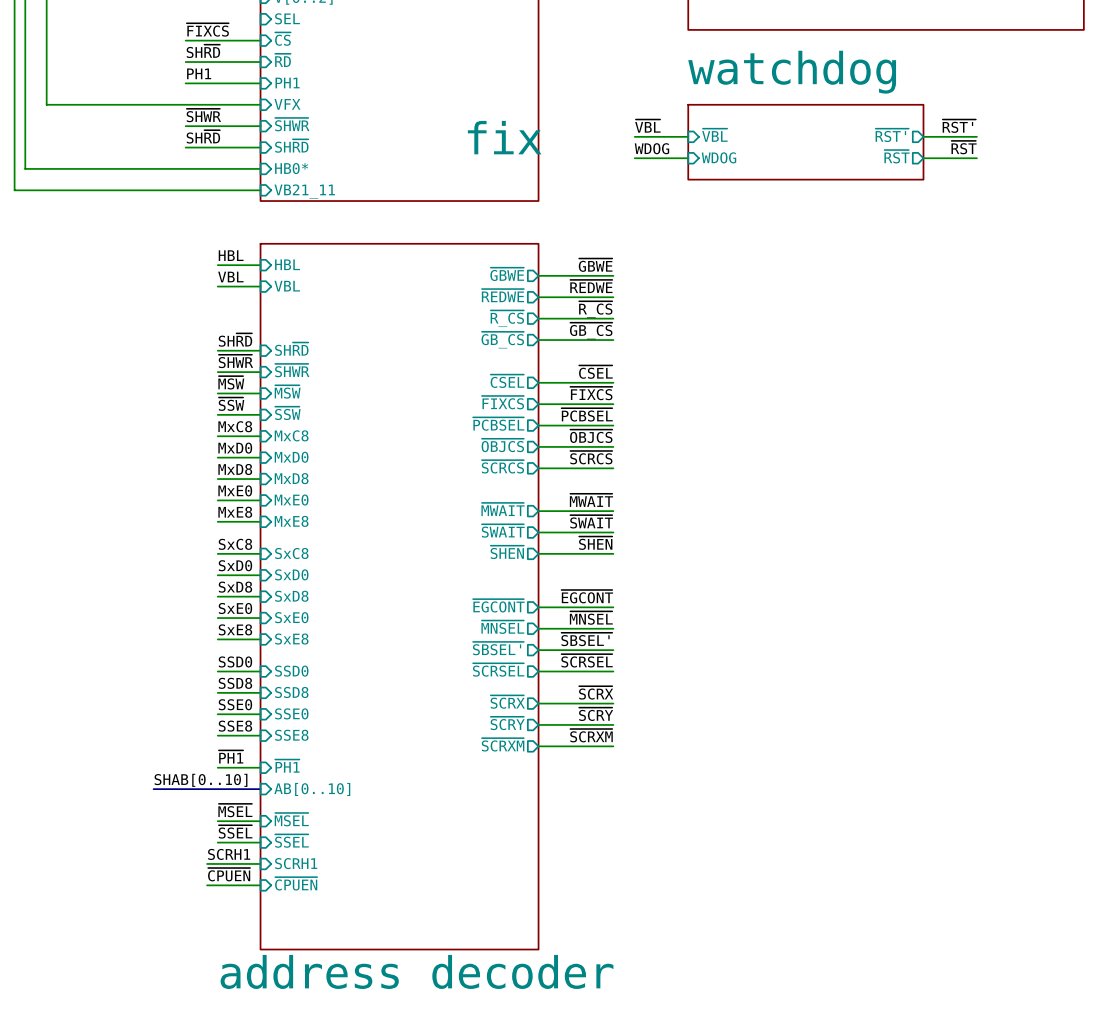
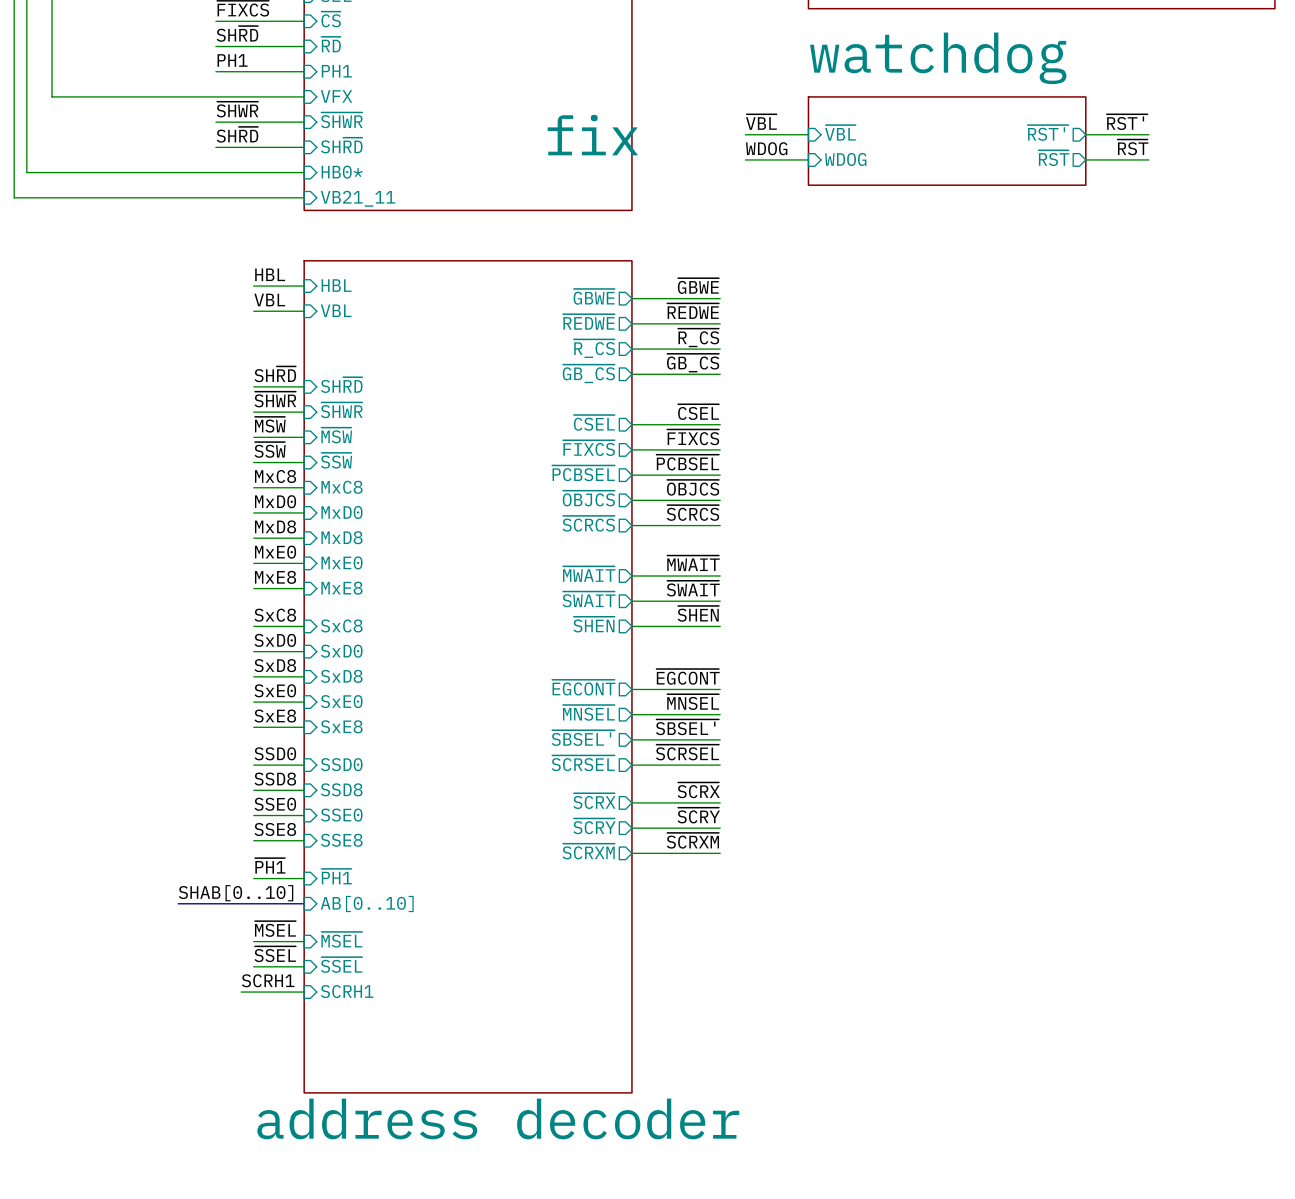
label: ~{CPUEN} (229, 874) -> none
sheet pin: ~{CPUEN} (296, 883) -> none
wire: (207, 885) (260, 885) -> none

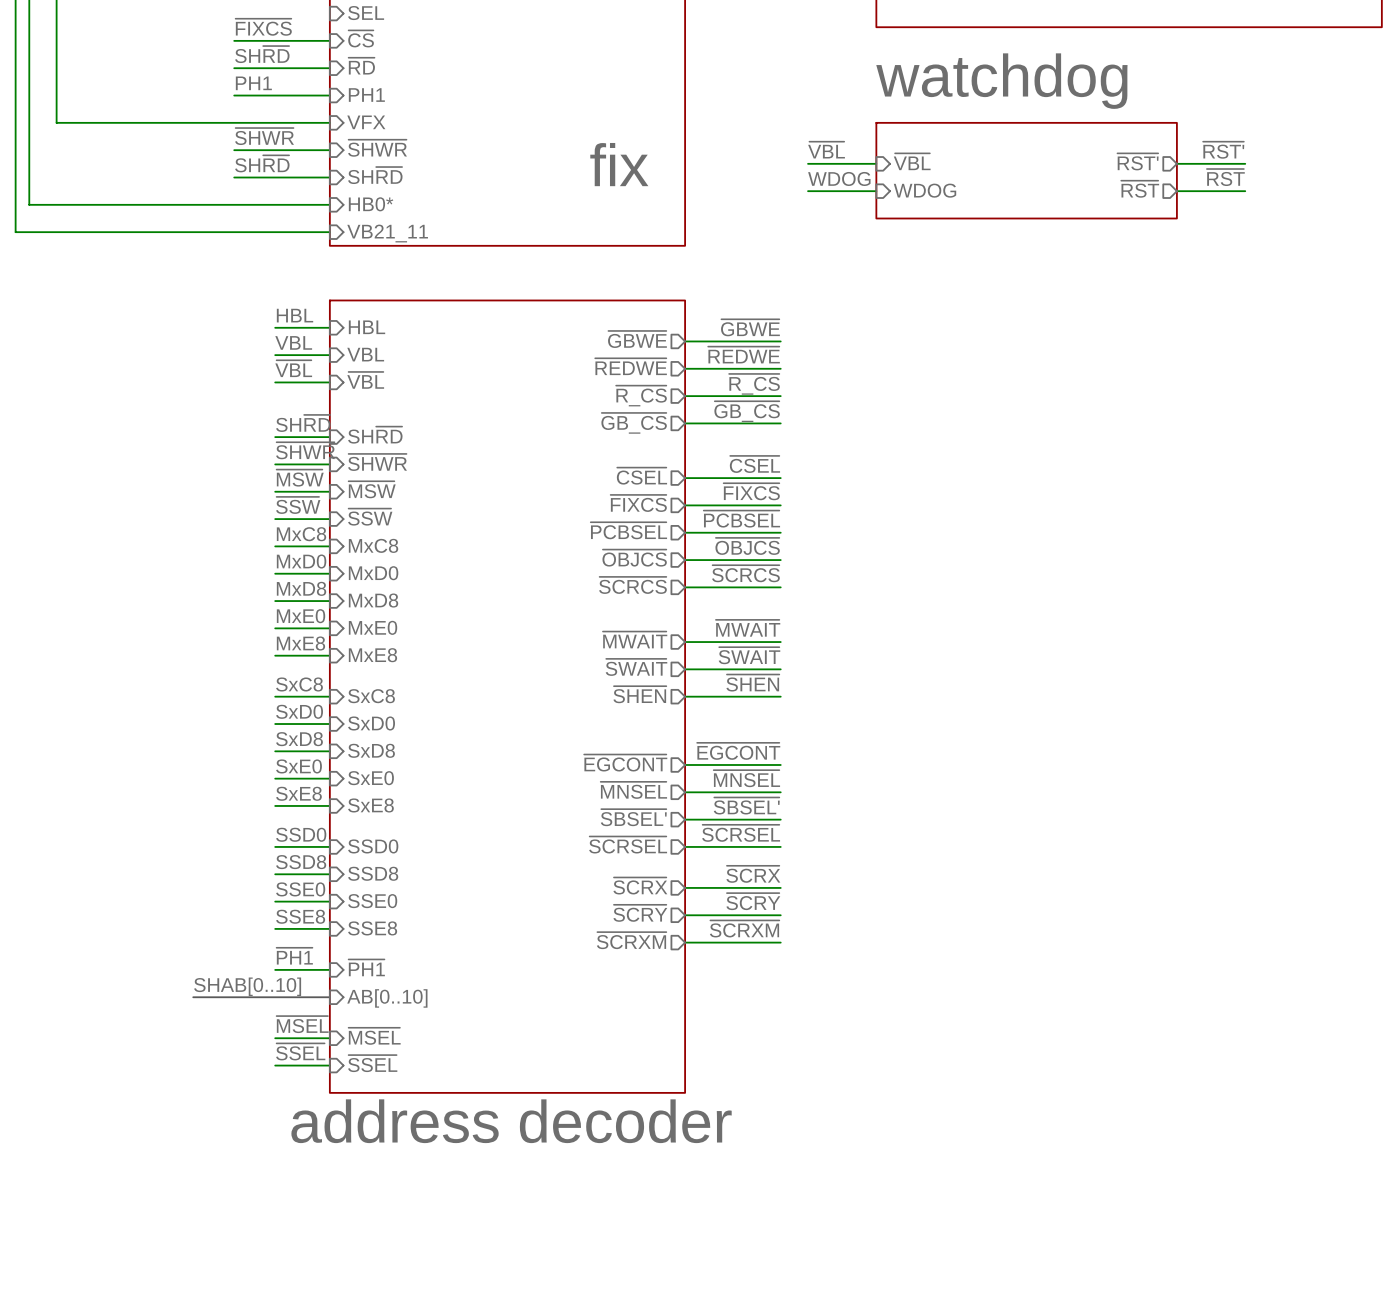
label: none -> ~{VBL} (293, 368)
sheet pin: none -> ~{VBL} (365, 380)
wire: none -> (275, 382) (329, 382)
sheet address decoder: none -> (507, 696)
sheet address decoder: (468, 676) -> none
label: SCRH1 (268, 980) -> none
sheet pin: SCRH1 (347, 991) -> none
wire: (241, 992) (304, 992) -> none

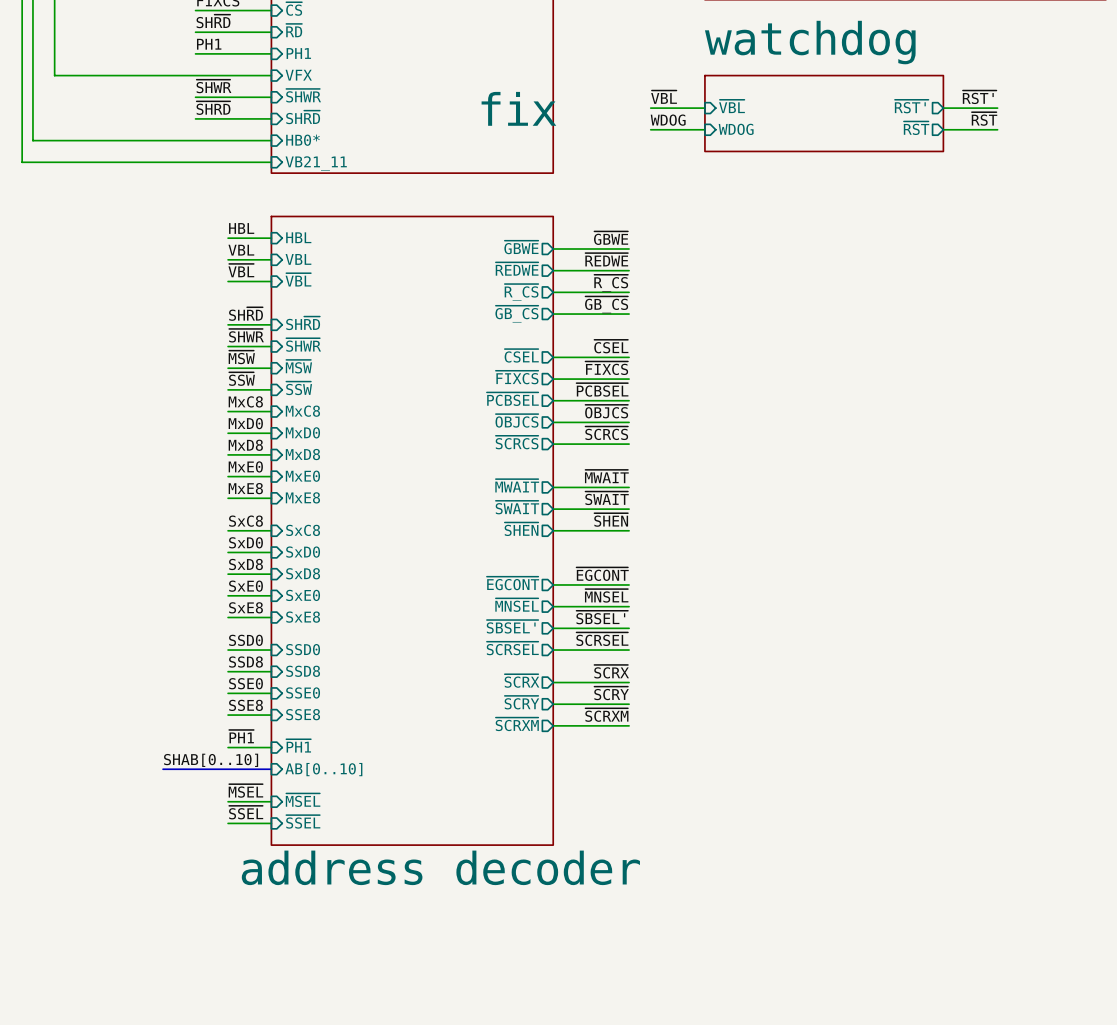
label: SH~{RD} (262, 163) -> ~{SHRD} (213, 108)

